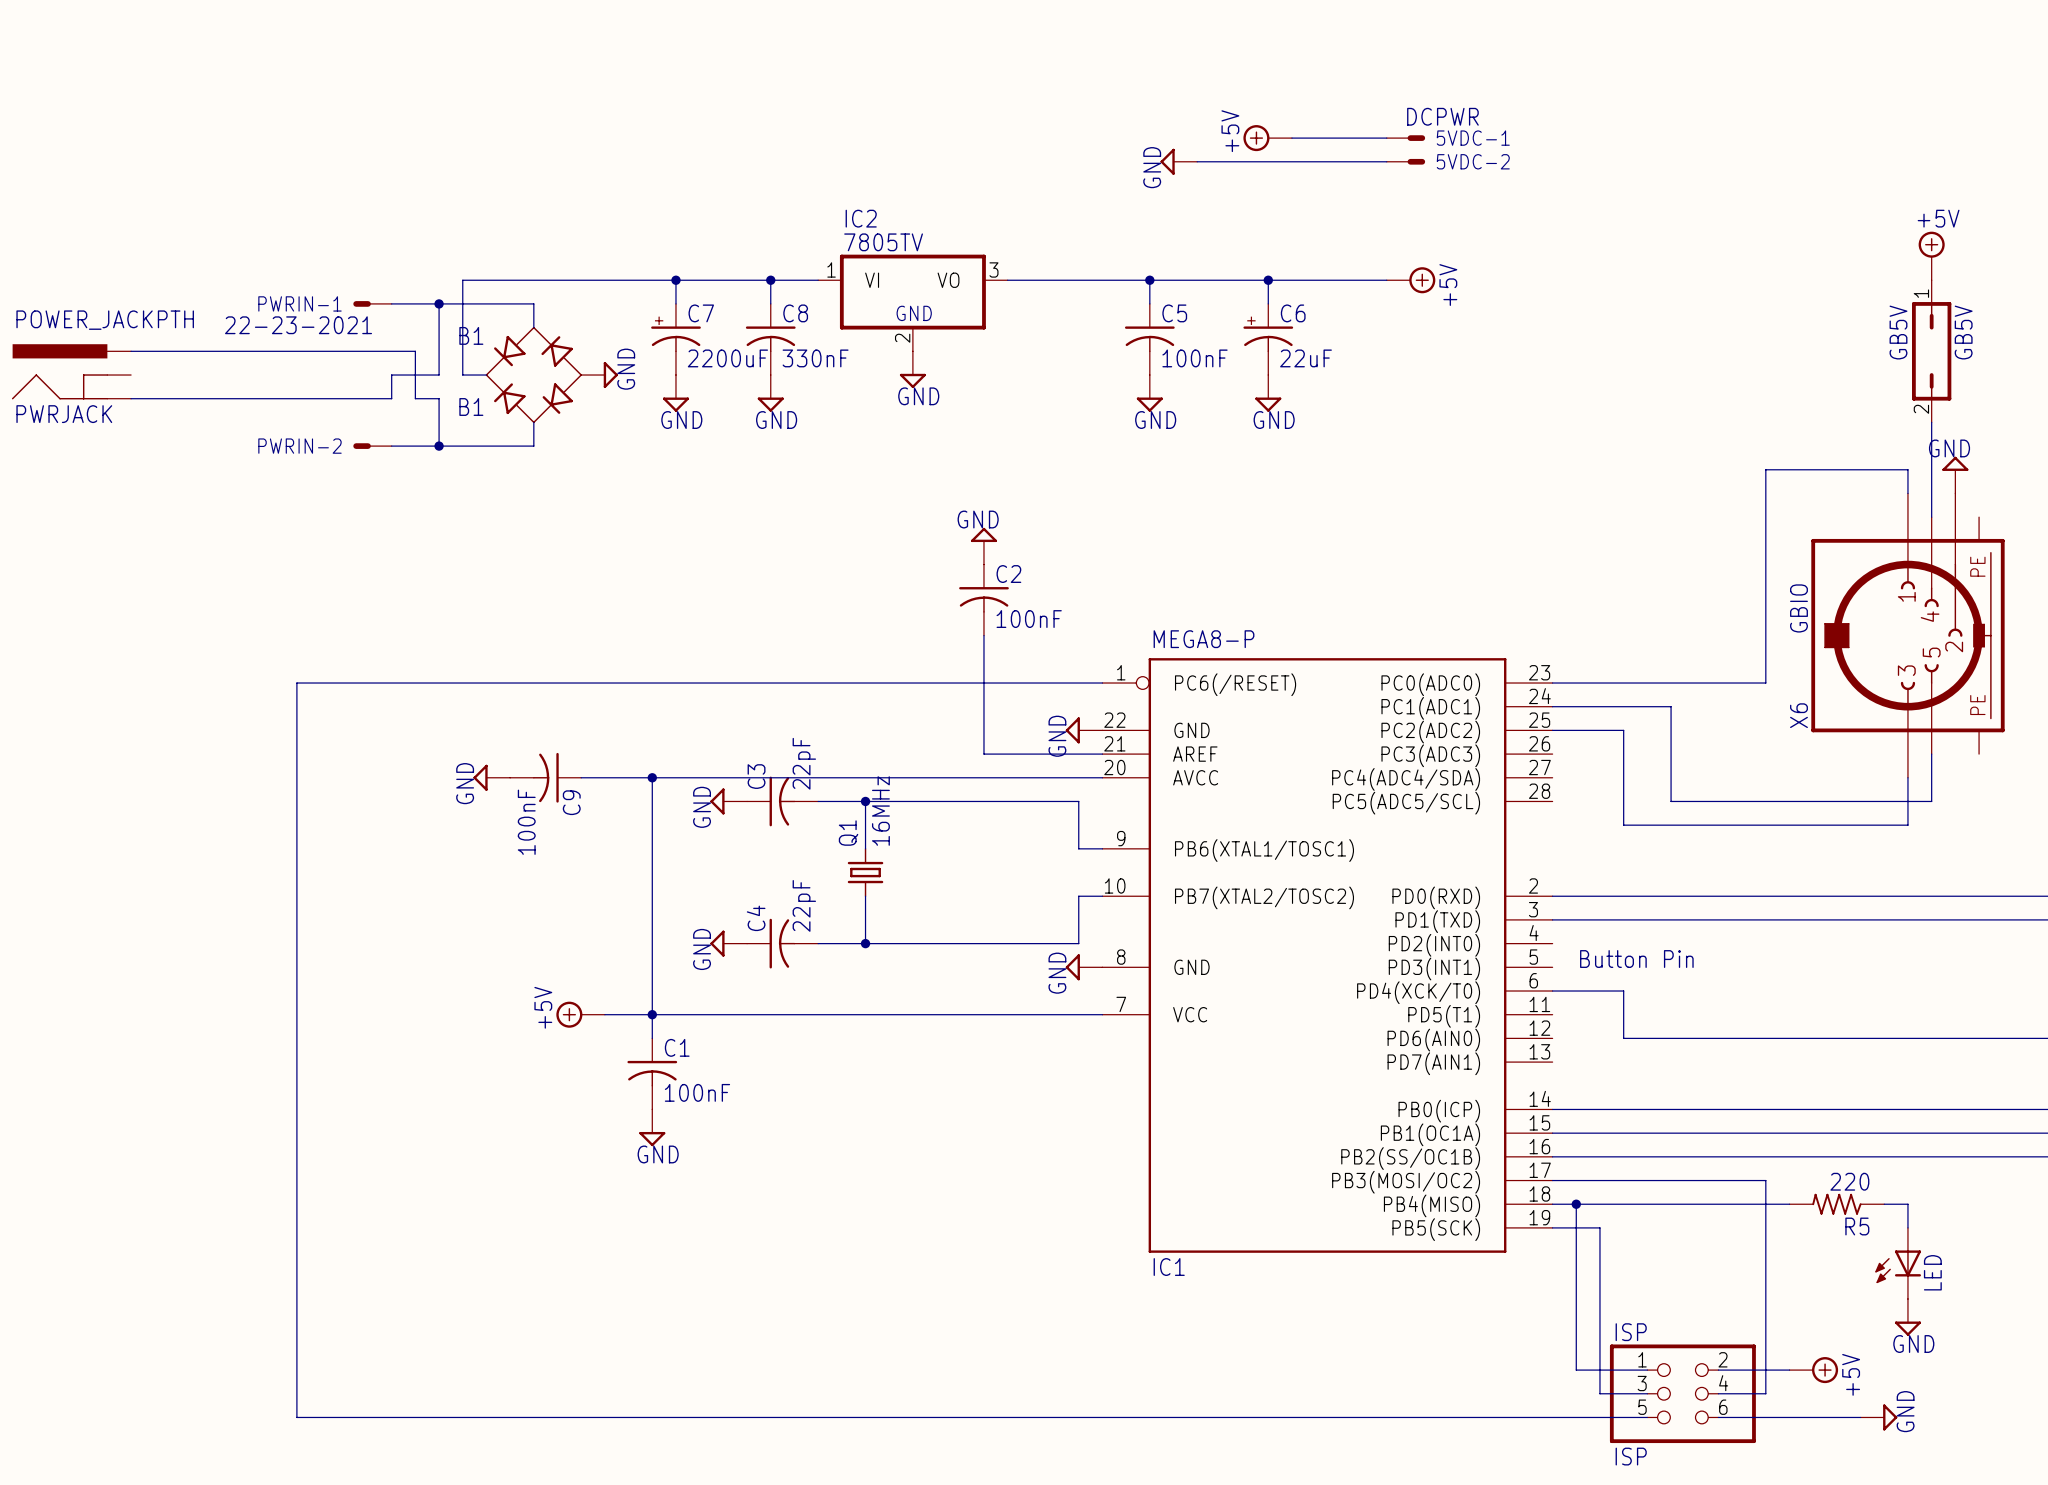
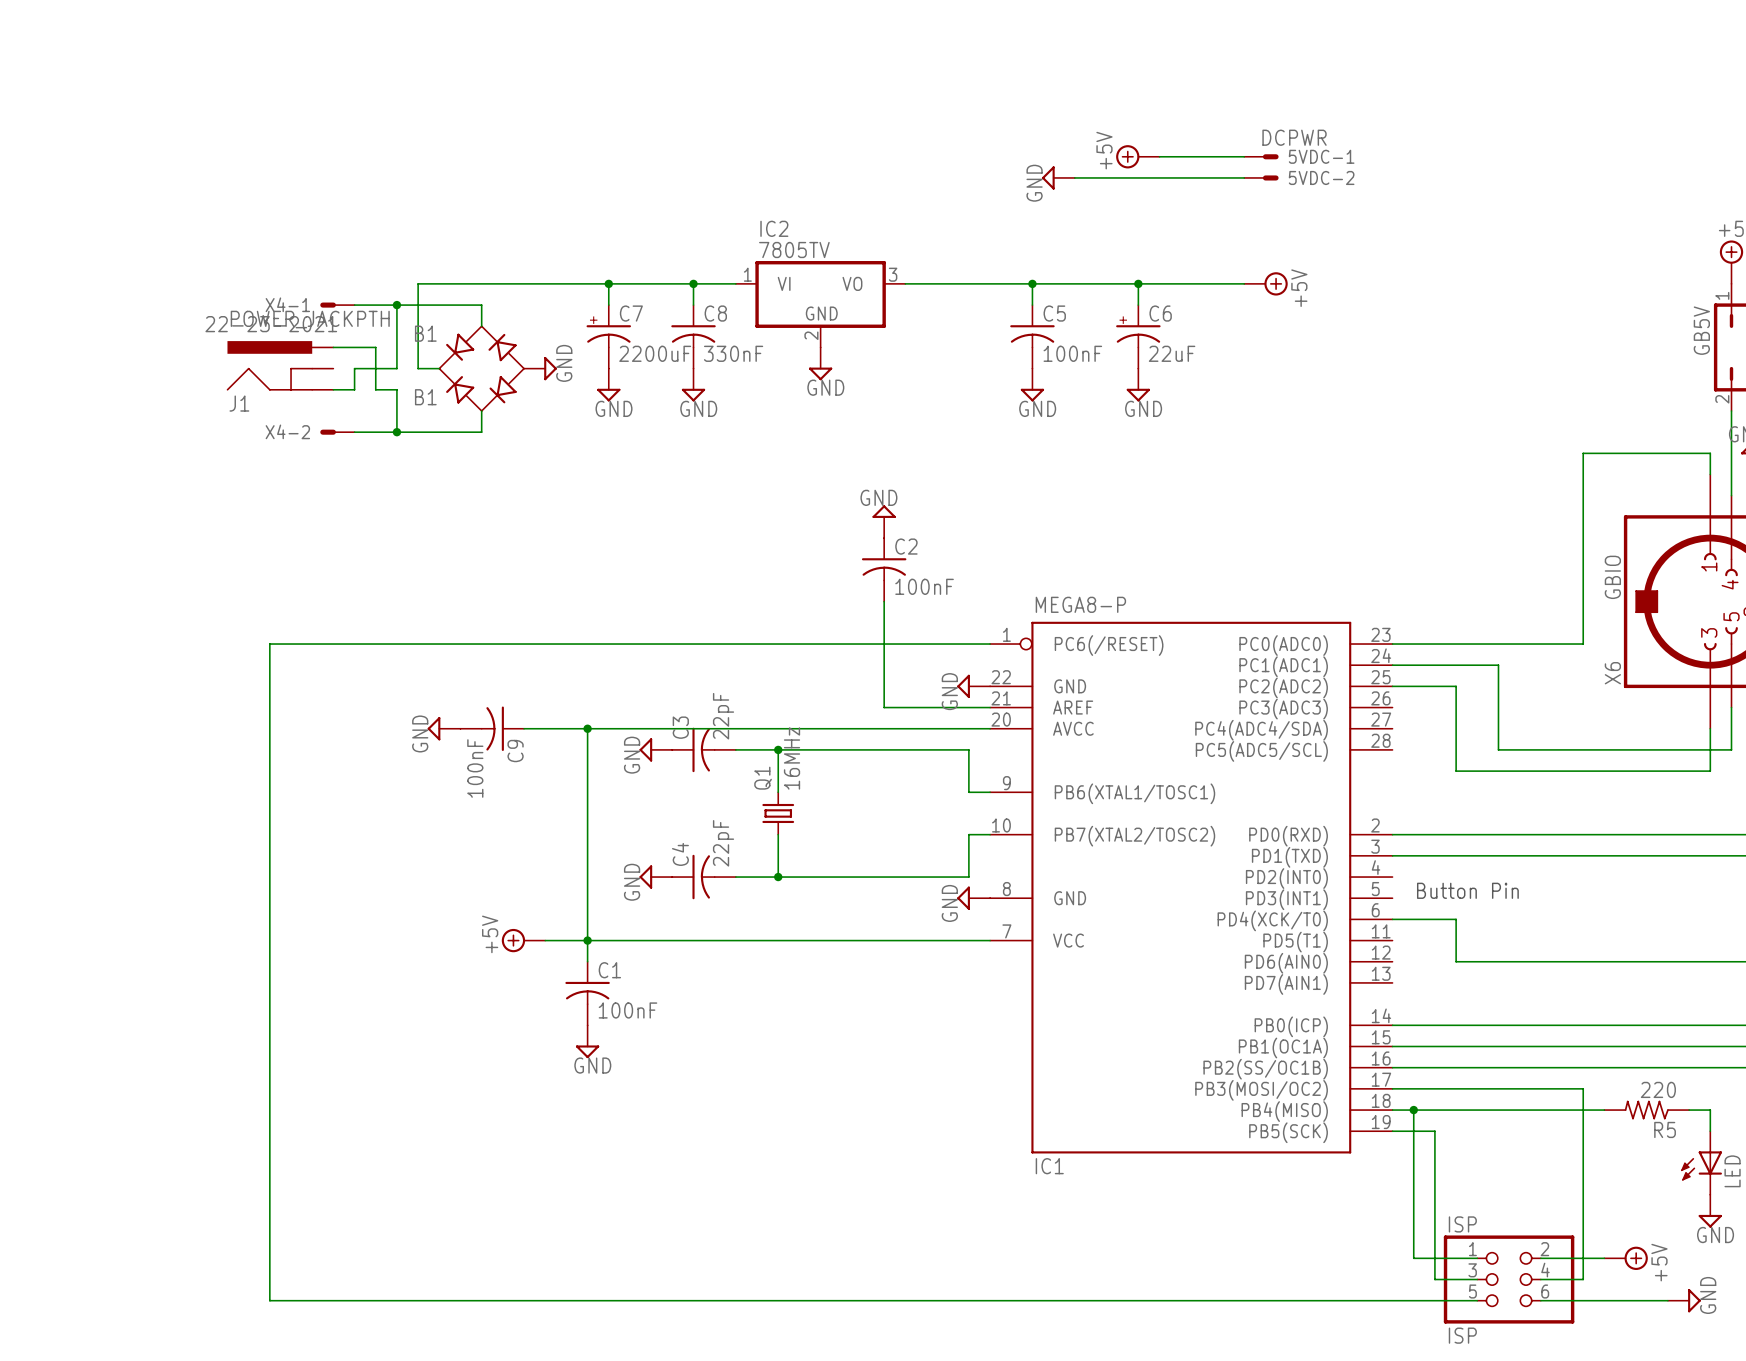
PWRIN-1 name: PWRIN-1 (299, 303) -> X4-1 (287, 304)
wire: (131, 351) (367, 351) -> none
PWRJACK: POWER_JACKPTH (71, 371) -> none
J1: none -> POWER_JACKPTH (280, 365)
wire: (131, 398) (367, 398) -> none
PWRIN-2 name: PWRIN-2 (299, 446) -> X4-2 (287, 431)

